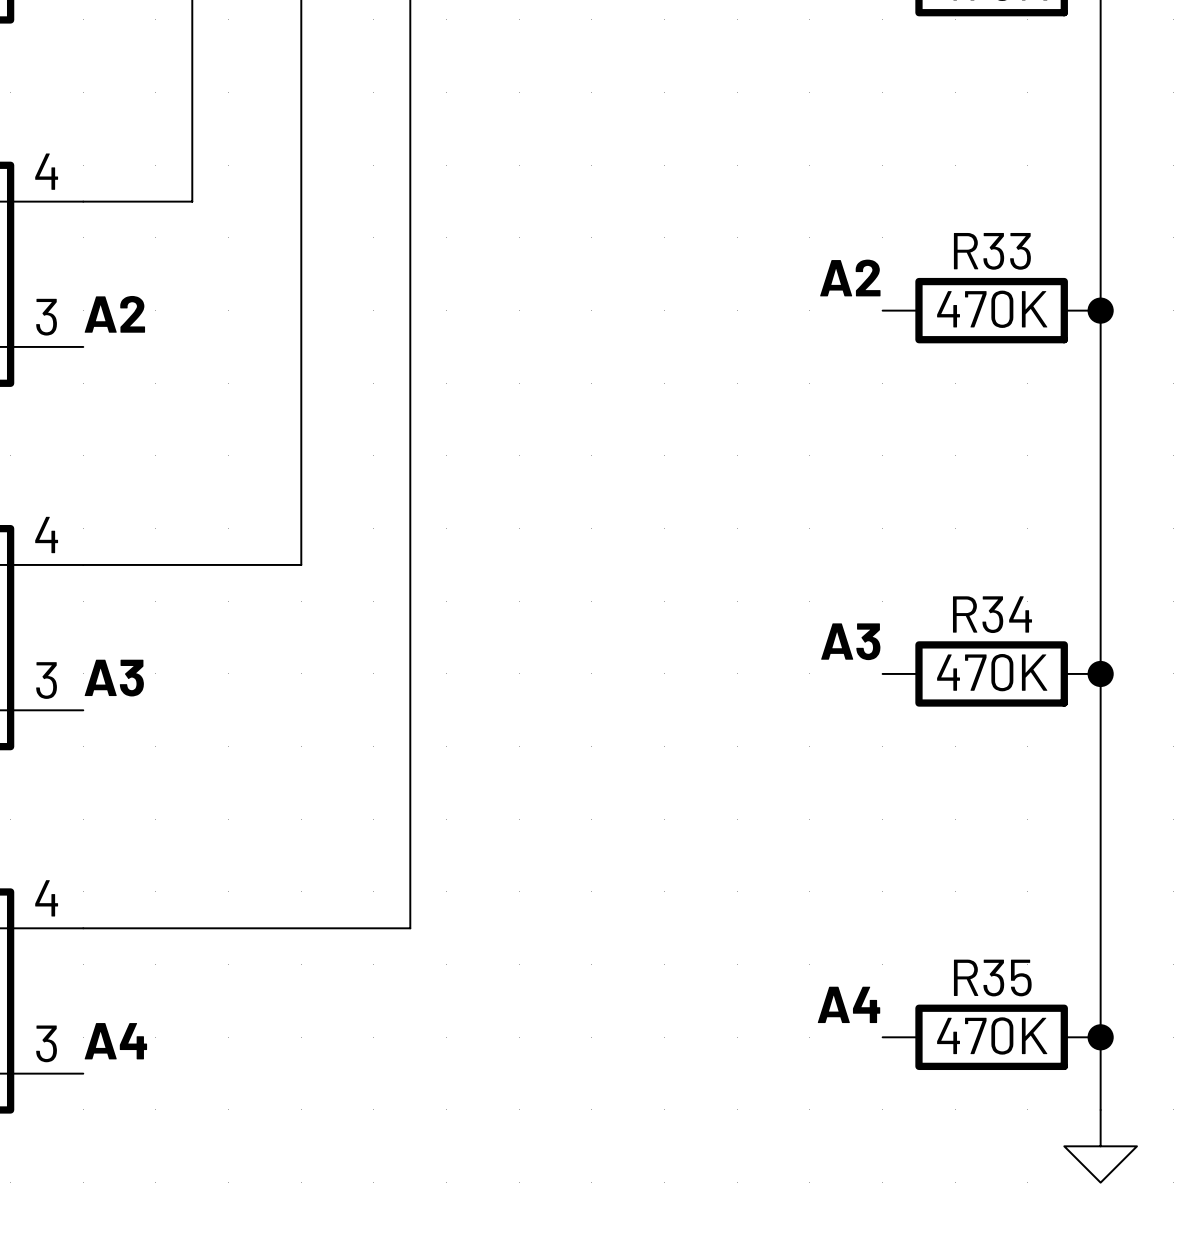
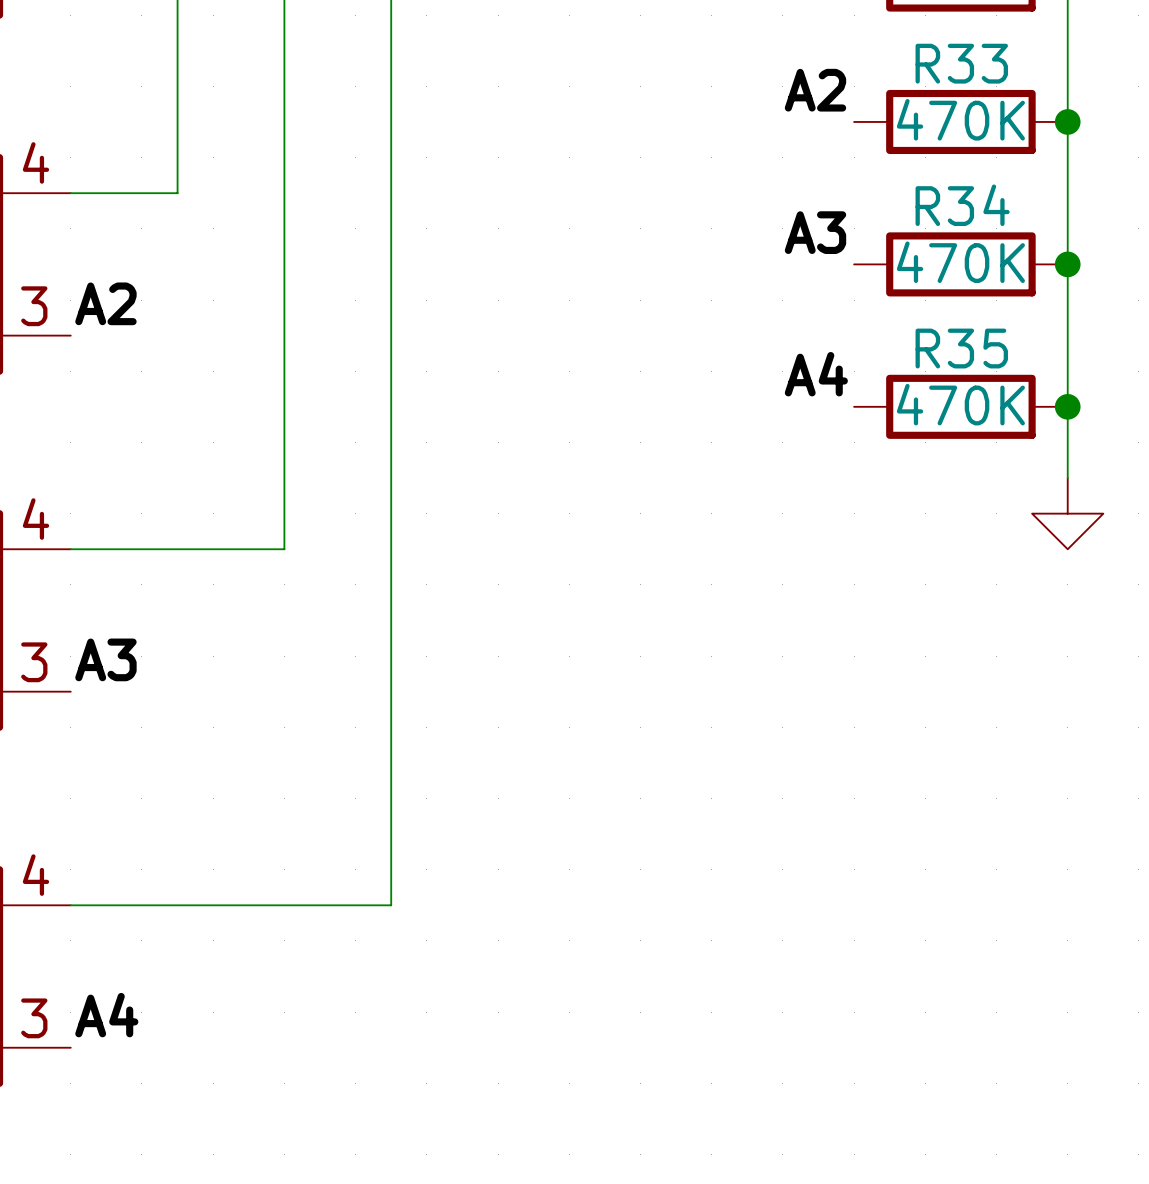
junction: none -> (1067, 121)
label position: A2 (850, 278) -> A2 (815, 90)
R33 position: (991, 310) -> (960, 121)
junction position: (1100, 310) -> (1067, 264)
junction: none -> (1067, 406)
wire: (1100, 492) (1100, 1109) -> none
label position: A3 (850, 641) -> A3 (815, 232)
R34 position: (991, 673) -> (960, 264)
junction: (1100, 673) -> none
label position: A4 (848, 1004) -> A4 (816, 374)
R35 position: (991, 1037) -> (960, 406)
junction: (1100, 1037) -> none
power symbol position: (1100, 1146) -> (1067, 513)

